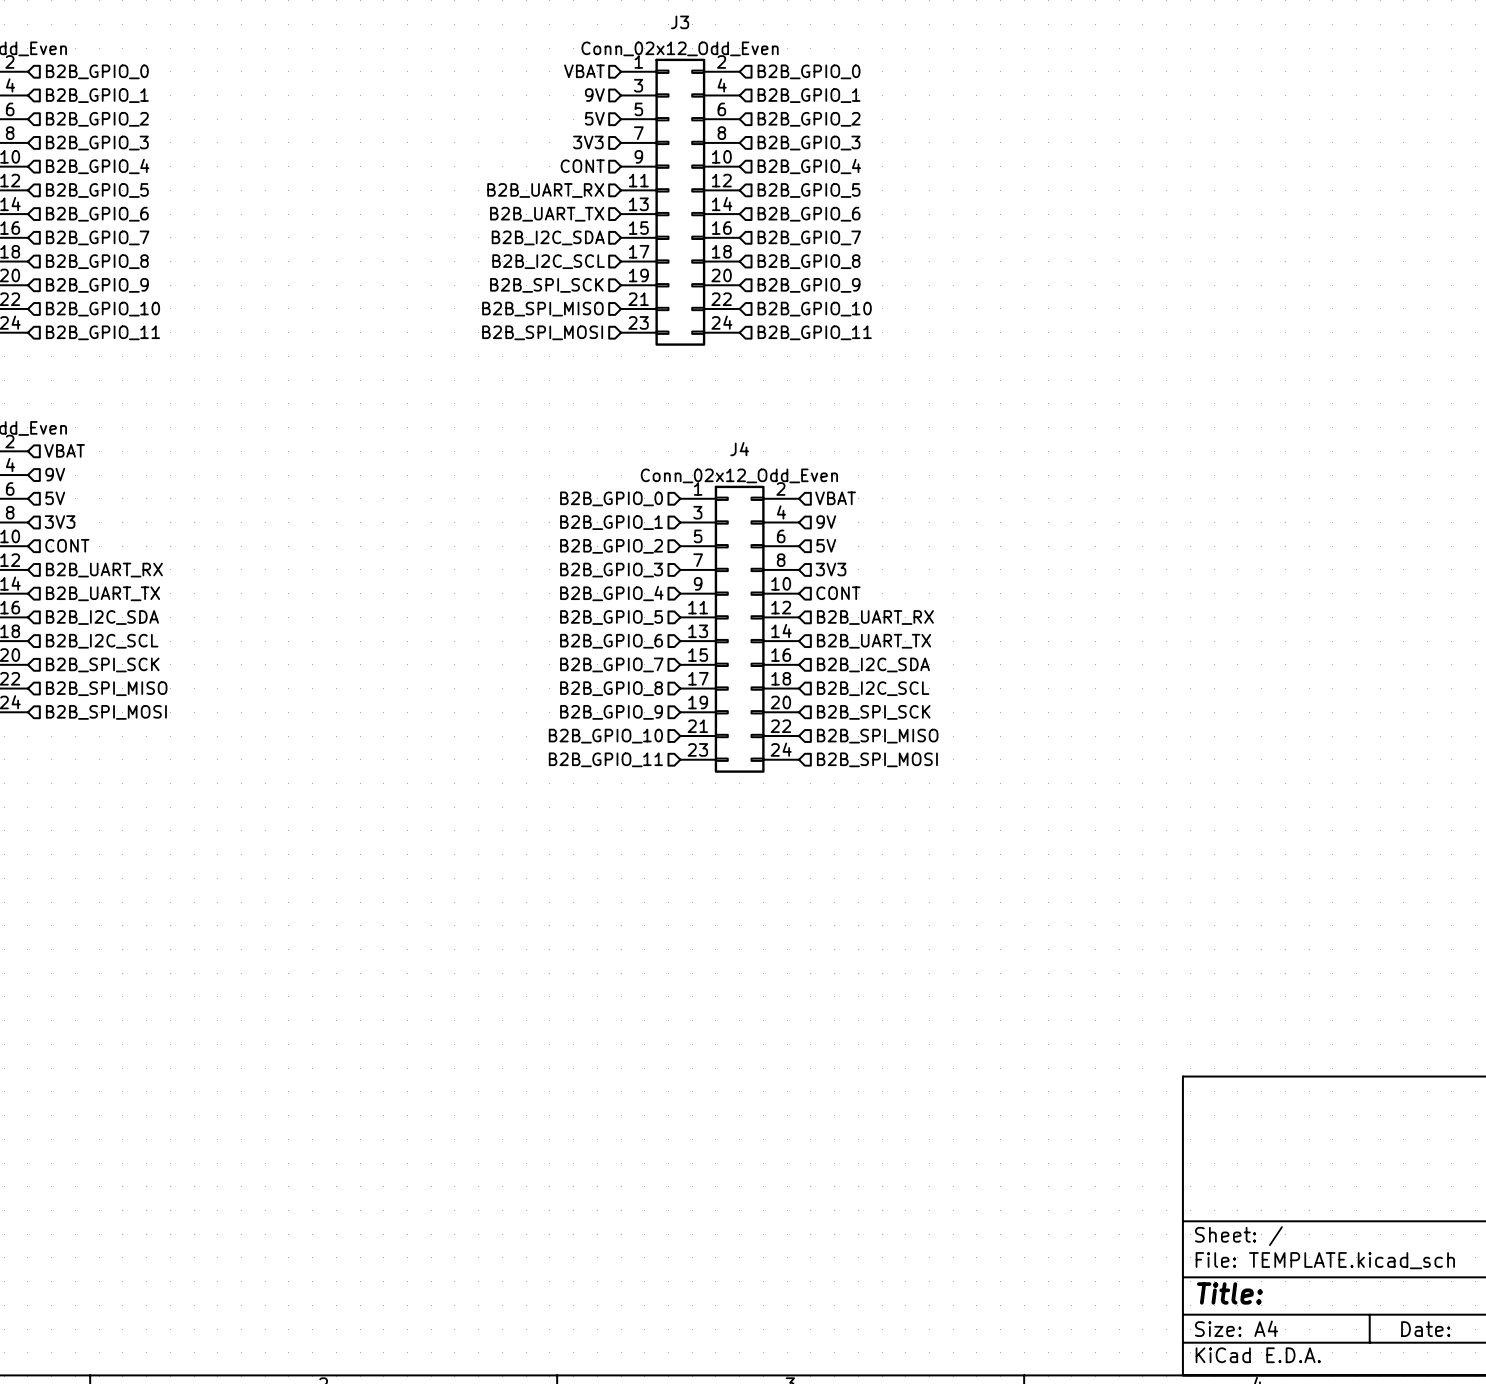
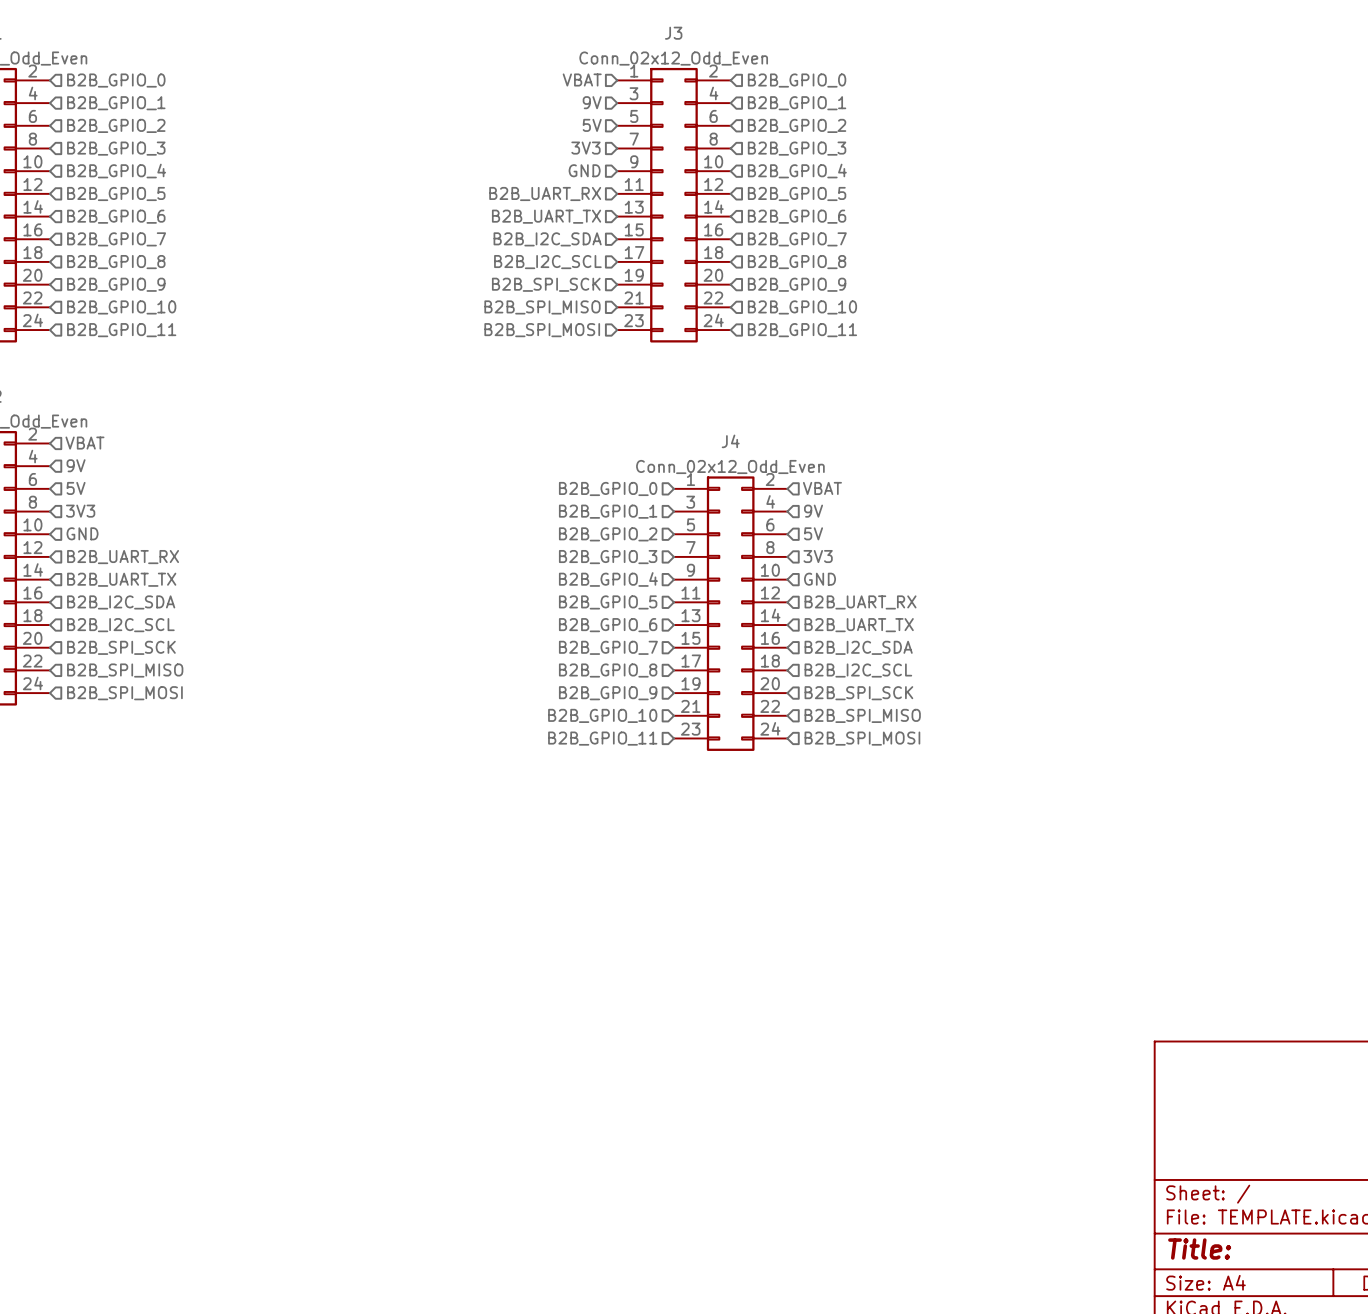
hierarchical label: CONT (582, 166) -> GND (584, 170)
hierarchical label: CONT (67, 545) -> GND (82, 533)
hierarchical label: CONT (838, 593) -> GND (820, 579)

